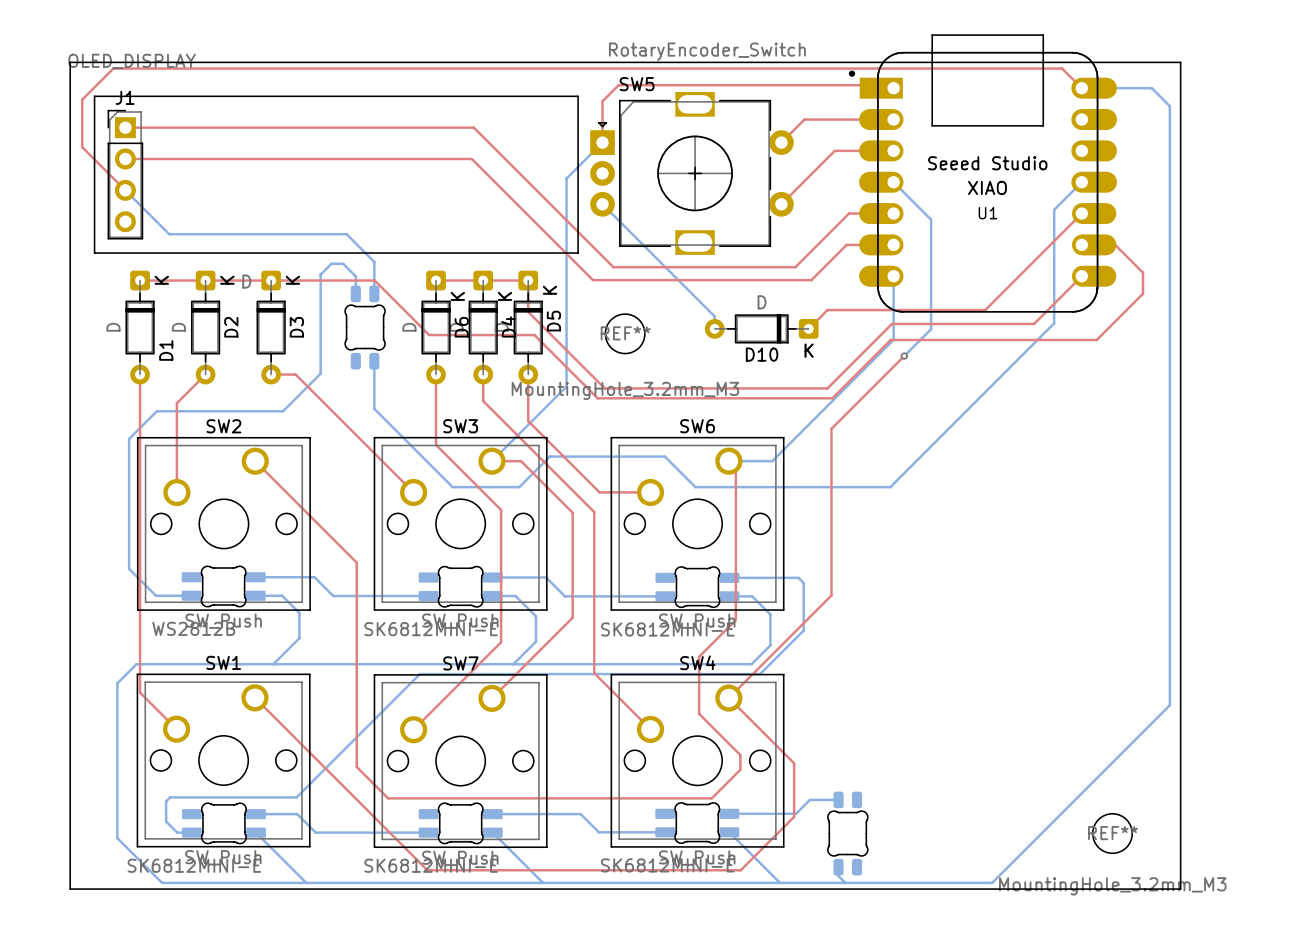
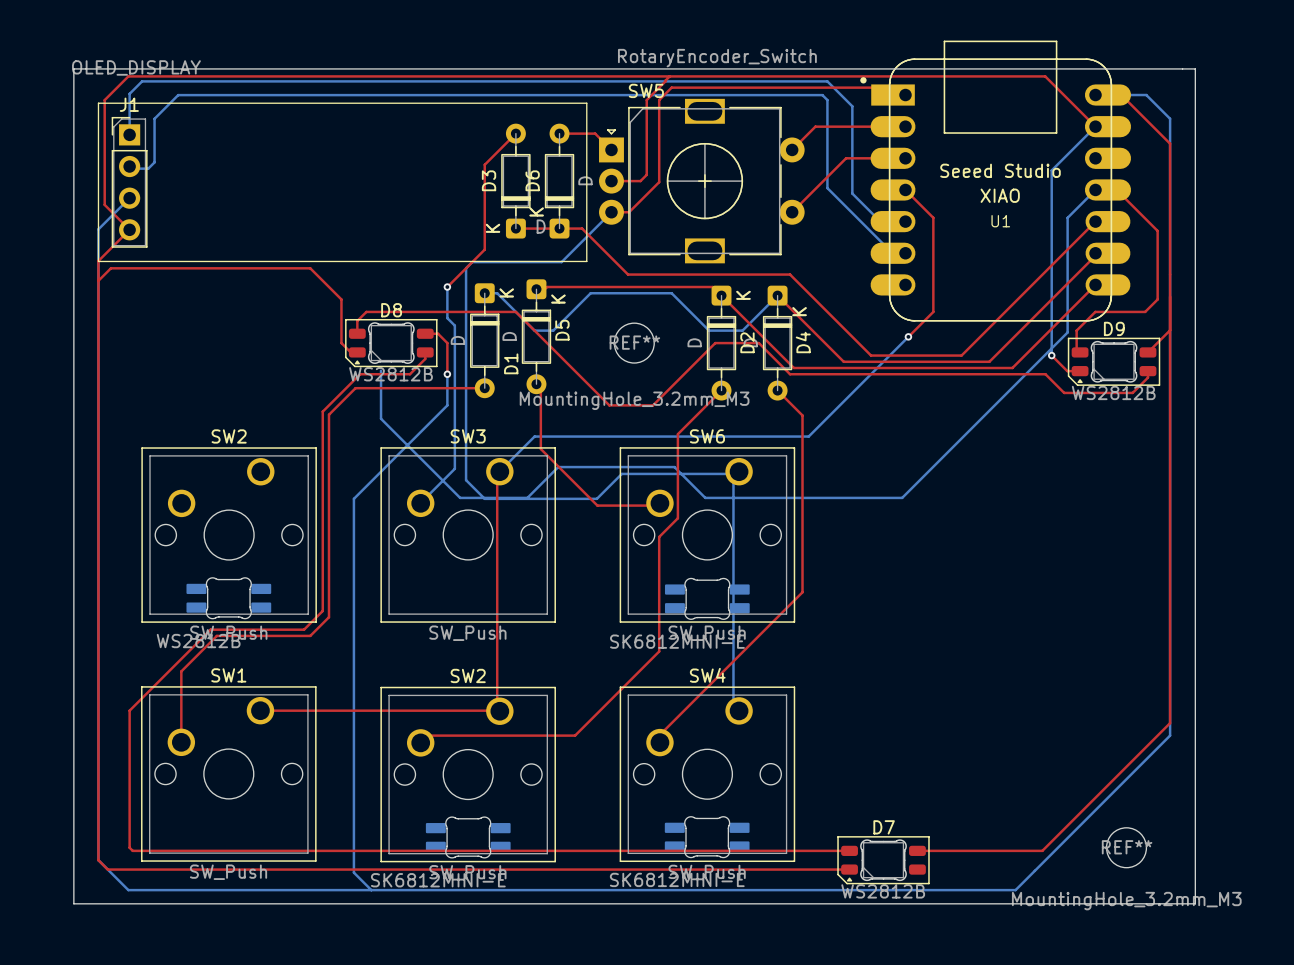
top track: none -> (669, 76) (646, 100) (646, 174) (640, 181) (611, 181)
top track: (890, 85) (618, 85) (602, 101) (602, 142) -> (902, 92) (898, 87) (671, 87) (659, 100) (659, 182) (629, 212) (611, 212)
top track: (1081, 88) (1062, 68) (113, 68) (82, 99) (82, 147) (125, 190) -> (1095, 95) (1121, 95) (1170, 143) (1170, 723) (1042, 850) (917, 850)
bottom track: (1132, 88) (1151, 88) (1169, 106) (1169, 705) (992, 882) (162, 882) (117, 838) (117, 683) (136, 664) (751, 664) (770, 645) (770, 614) (752, 596) (729, 596) -> (1146, 95) (1170, 118) (1170, 735) (1015, 890) (128, 890) (98, 860) (98, 229) (129, 198)
top track: none -> (1095, 126) (1045, 76) (128, 76) (104, 100) (104, 204) (129, 229) (98, 260) (98, 860) (107, 869) (849, 869)
bottom track: none -> (1109, 126) (1095, 126) (1051, 170) (1051, 355)
top track: none -> (515, 133) (484, 164) (484, 249) (447, 287)
top track: none -> (559, 133) (595, 133) (611, 149)
top track: (125, 127) (473, 127) (613, 267) (795, 267) (849, 213) (893, 213) -> none
bottom track: none -> (129, 134) (129, 93) (142, 81) (827, 81) (852, 106) (852, 193) (880, 221) (905, 221)
bottom track: (602, 142) (566, 178) (566, 386) (491, 461) -> none
top track: (125, 159) (471, 159) (593, 280) (811, 280) (846, 244) (893, 244) -> none
bottom track: none -> (129, 166) (131, 168) (148, 168) (154, 162) (154, 118) (178, 95) (822, 95) (827, 100) (827, 188) (892, 253) (905, 253)
top track: none -> (905, 189) (933, 217) (933, 311) (908, 336)
bottom track: (893, 182) (931, 219) (931, 329) (904, 356) -> none
top track: none -> (1095, 189) (1116, 189) (1157, 230) (1157, 299) (1145, 311) (1095, 311) (1076, 330) (1076, 349) (1080, 352)
bottom track: (125, 190) (169, 234) (346, 234) (374, 261) (374, 293) -> none
bottom track: (602, 204) (714, 316) (714, 328) -> (611, 212) (561, 262) (472, 262) (466, 268) (466, 480) (484, 498) (596, 498) (621, 473) (733, 473) (733, 711)
top track: (1081, 244) (1115, 244) (1143, 272) (1143, 293) (1096, 340) (890, 340) (832, 398) (597, 398) (534, 335) (429, 335) (374, 280) (140, 280) -> (1095, 253) (1095, 255) (989, 361) (843, 361) (777, 295)
top track: none -> (98, 280) (110, 268) (310, 268) (341, 299) (341, 343) (350, 352) (357, 352)
bottom track: (893, 276) (893, 339) (772, 461) (728, 461) -> none
bottom track: none -> (447, 287) (447, 318) (454, 325) (454, 468) (418, 505)
via: none -> (447, 287)
top track: (436, 280) (528, 280) (528, 311) (604, 388) (827, 388) (891, 323) (1034, 323) -> (540, 293) (547, 287) (712, 287) (793, 368) (1012, 368) (1047, 333)
bottom track: none -> (484, 293) (497, 293) (534, 330) (553, 330) (590, 293) (671, 293) (709, 330) (742, 330) (777, 295)
bottom track: (355, 293) (355, 276) (343, 263) (331, 263) (320, 274) (320, 373) (283, 411) (156, 411) (129, 439) (129, 568) (155, 595) (191, 595) -> none
top track: (985, 310) (827, 310) (808, 328) -> (998, 319) (961, 355) (871, 355) (790, 274) (628, 274) (582, 228) (515, 228)
top track: none -> (1170, 330) (1147, 352)
top track: none -> (357, 333) (357, 320) (366, 311) (515, 311) (609, 405) (652, 405) (715, 343) (758, 343) (790, 374) (1045, 374) (1064, 392) (1132, 392) (1147, 377) (1147, 371)
top track: none -> (425, 333) (438, 333) (447, 343) (447, 374)
D1 position: (140, 327) -> (484, 340)
D2 position: (205, 327) -> (721, 343)
D3 rotation: 0° (271, 327) -> 180° (515, 181)
D3 position: (271, 327) -> (515, 181)
D8 side: bottom (365, 327) -> top (391, 343)
D6 rotation: 0° (436, 327) -> 180° (559, 181)
D6 position: (436, 327) -> (559, 181)
D4 position: (483, 327) -> (777, 343)
bottom track: none -> (908, 336) (808, 436) (534, 436) (497, 473)
D10: D (761, 328) -> none
top track: none -> (425, 352) (425, 358) (409, 374) (360, 374) (322, 411) (322, 611) (304, 629) (210, 629) (129, 710) (129, 847) (132, 850) (849, 850)
top track: none -> (1051, 355) (1067, 371) (1080, 371)
via: none -> (1051, 355)
D9: none -> WS2812B (1114, 361)
top track: (904, 356) (831, 428) (831, 595) (728, 698) (794, 763) (794, 816) (740, 870) (427, 870) (254, 697) -> (497, 473) (497, 710) (260, 710)
via position: (904, 356) -> (908, 336)
bottom track: none -> (447, 374) (447, 405) (353, 498) (353, 872) (371, 890)
via: none -> (447, 374)
top track: (140, 374) (140, 692) (176, 729) -> (484, 388) (355, 388) (329, 414) (329, 617) (310, 635) (216, 635) (181, 671) (181, 742)
top track: (205, 374) (176, 403) (176, 492) -> none
top track: (271, 374) (295, 374) (413, 492) -> none
top track: (436, 374) (436, 444) (501, 509) (501, 642) (413, 729) -> none
top track: (483, 374) (483, 401) (594, 512) (594, 673) (650, 729) -> none
top track: (528, 374) (528, 421) (599, 492) (650, 492) -> none
top track: none -> (540, 388) (540, 449) (597, 505) (654, 505)
top track: none -> (721, 390) (677, 434) (677, 518) (659, 536) (659, 651) (575, 735) (424, 735) (418, 742)
top track: none -> (777, 390) (802, 415) (802, 592) (654, 740) (654, 743)
top track: (255, 461) (356, 562) (356, 766) (388, 798) (711, 798) (740, 769) (740, 755) -> none
top track: (491, 461) (521, 461) (572, 512) (572, 617) (491, 698) -> none
top track: (728, 461) (735, 468) (735, 620) (699, 656) (699, 713) (740, 755) -> none
bottom track: (255, 577) (314, 577) (333, 596) (428, 596) -> none
bottom track: (492, 577) (546, 577) (564, 596) (665, 596) -> none
bottom track: (729, 577) (798, 577) (803, 583) (803, 630) (760, 674) (419, 674) (296, 797) (170, 797) (166, 801) (166, 821) (177, 832) (191, 832) -> none
part: SK6812MINI-E (460, 586) -> none
bottom track: (255, 595) (282, 595) (299, 612) (299, 638) (273, 664) -> none
bottom track: (492, 596) (515, 596) (535, 616) (535, 641) (513, 664) -> none
SW7 name: SW7 (460, 663) -> SW2 (468, 675)
bottom track: (838, 799) (809, 799) (796, 813) (729, 813) -> none
bottom track: (256, 814) (297, 814) (315, 832) (428, 832) -> none
bottom track: (492, 814) (580, 814) (598, 832) (665, 832) -> none
part: SK6812MINI-E (223, 823) -> none
bottom track: (256, 832) (306, 882) -> none
bottom track: (492, 832) (543, 882) -> none
bottom track: (729, 832) (779, 882) -> none
D7 side: bottom (847, 833) -> top (883, 860)
bottom track: (838, 867) (838, 876) (845, 882) -> none

